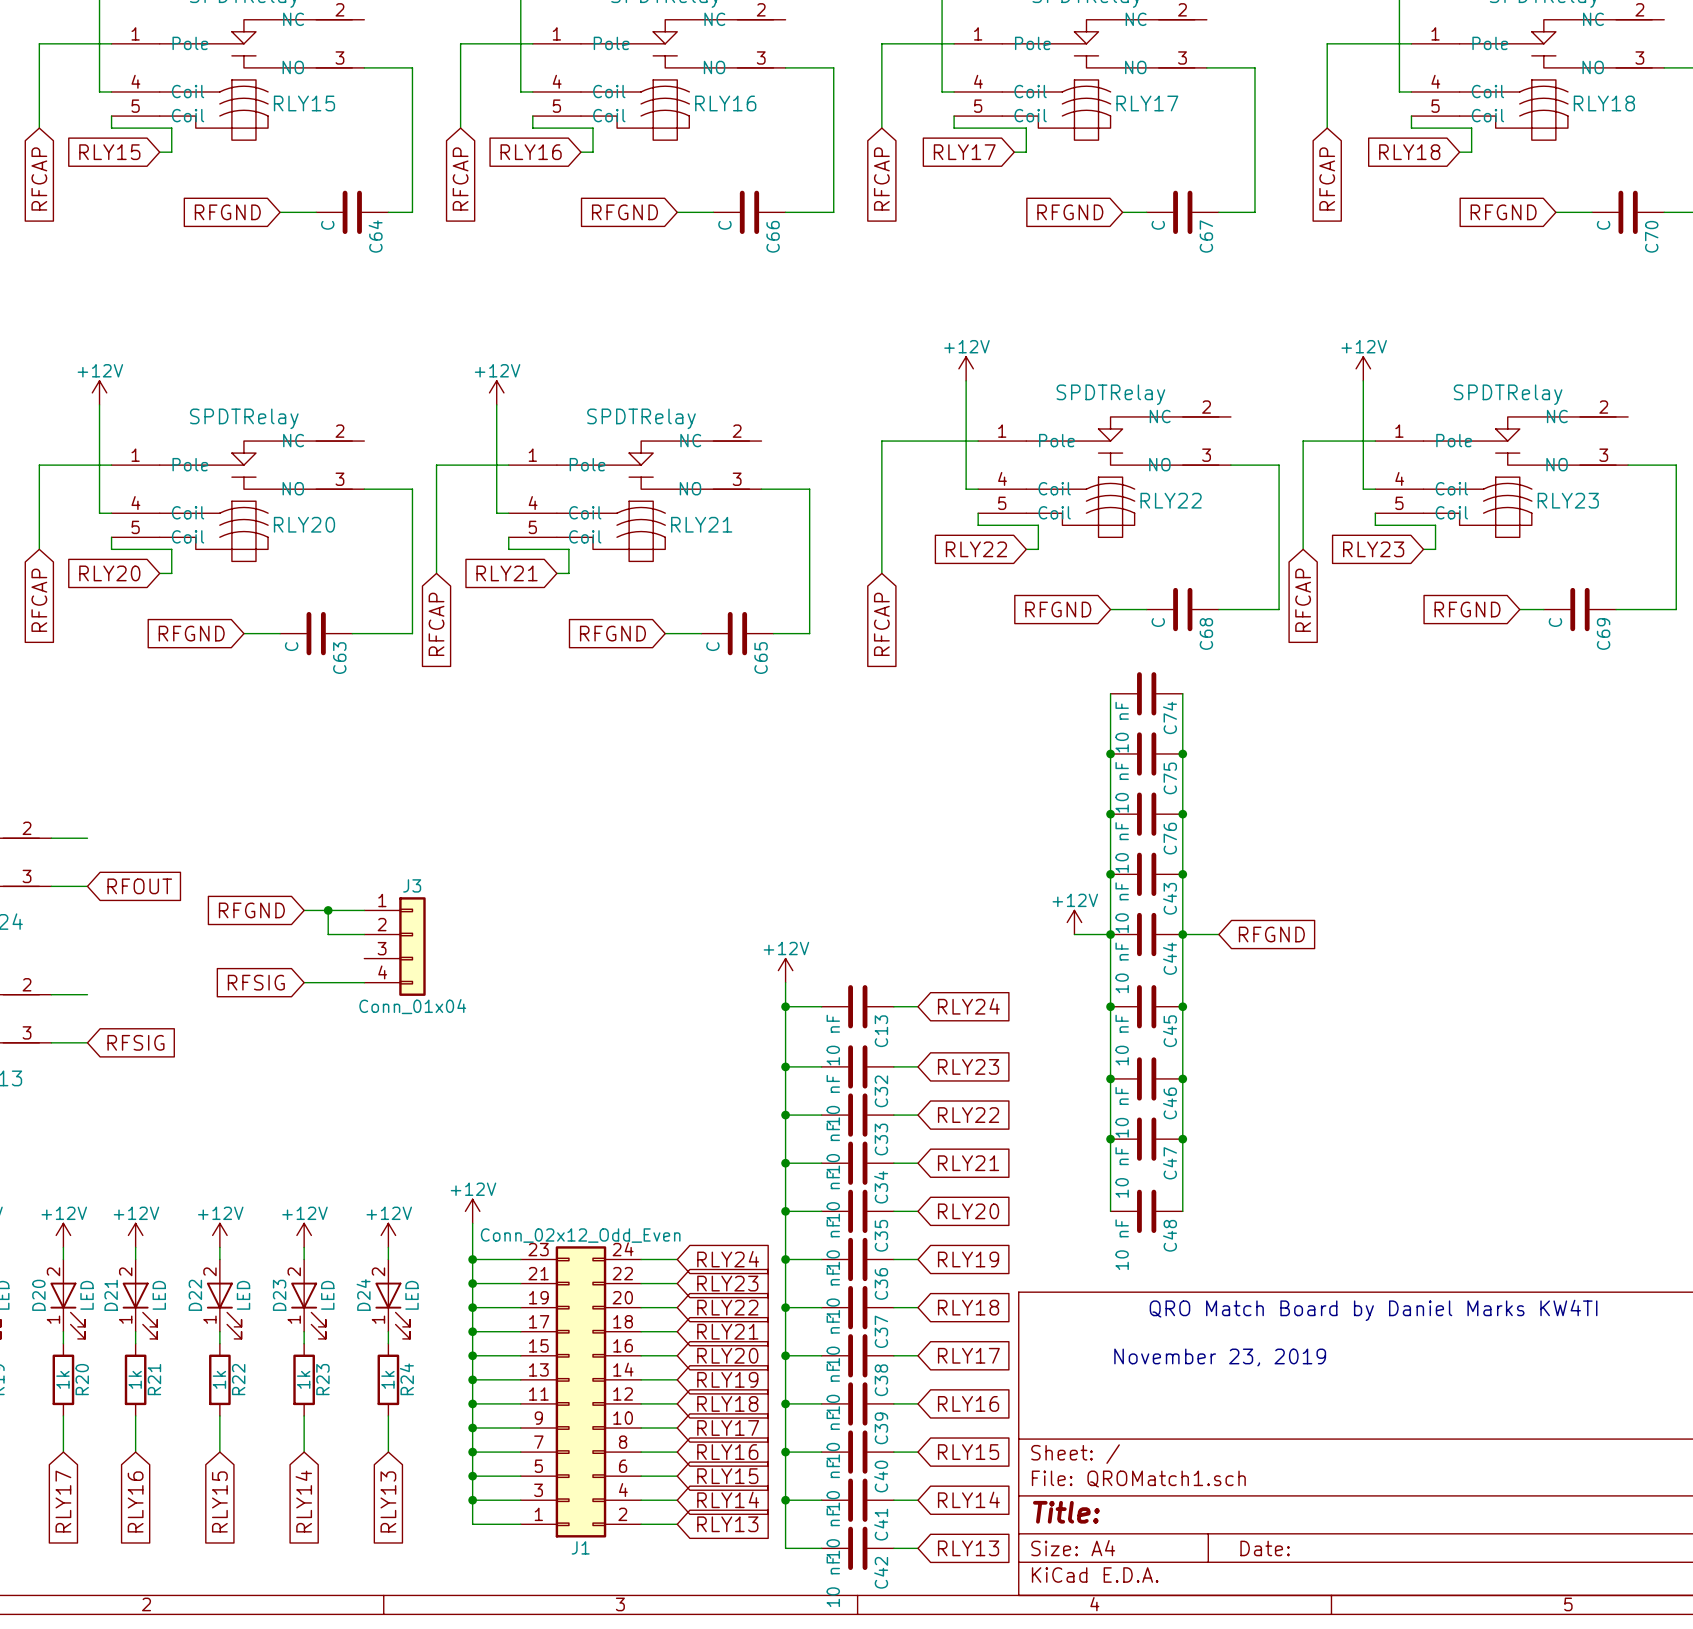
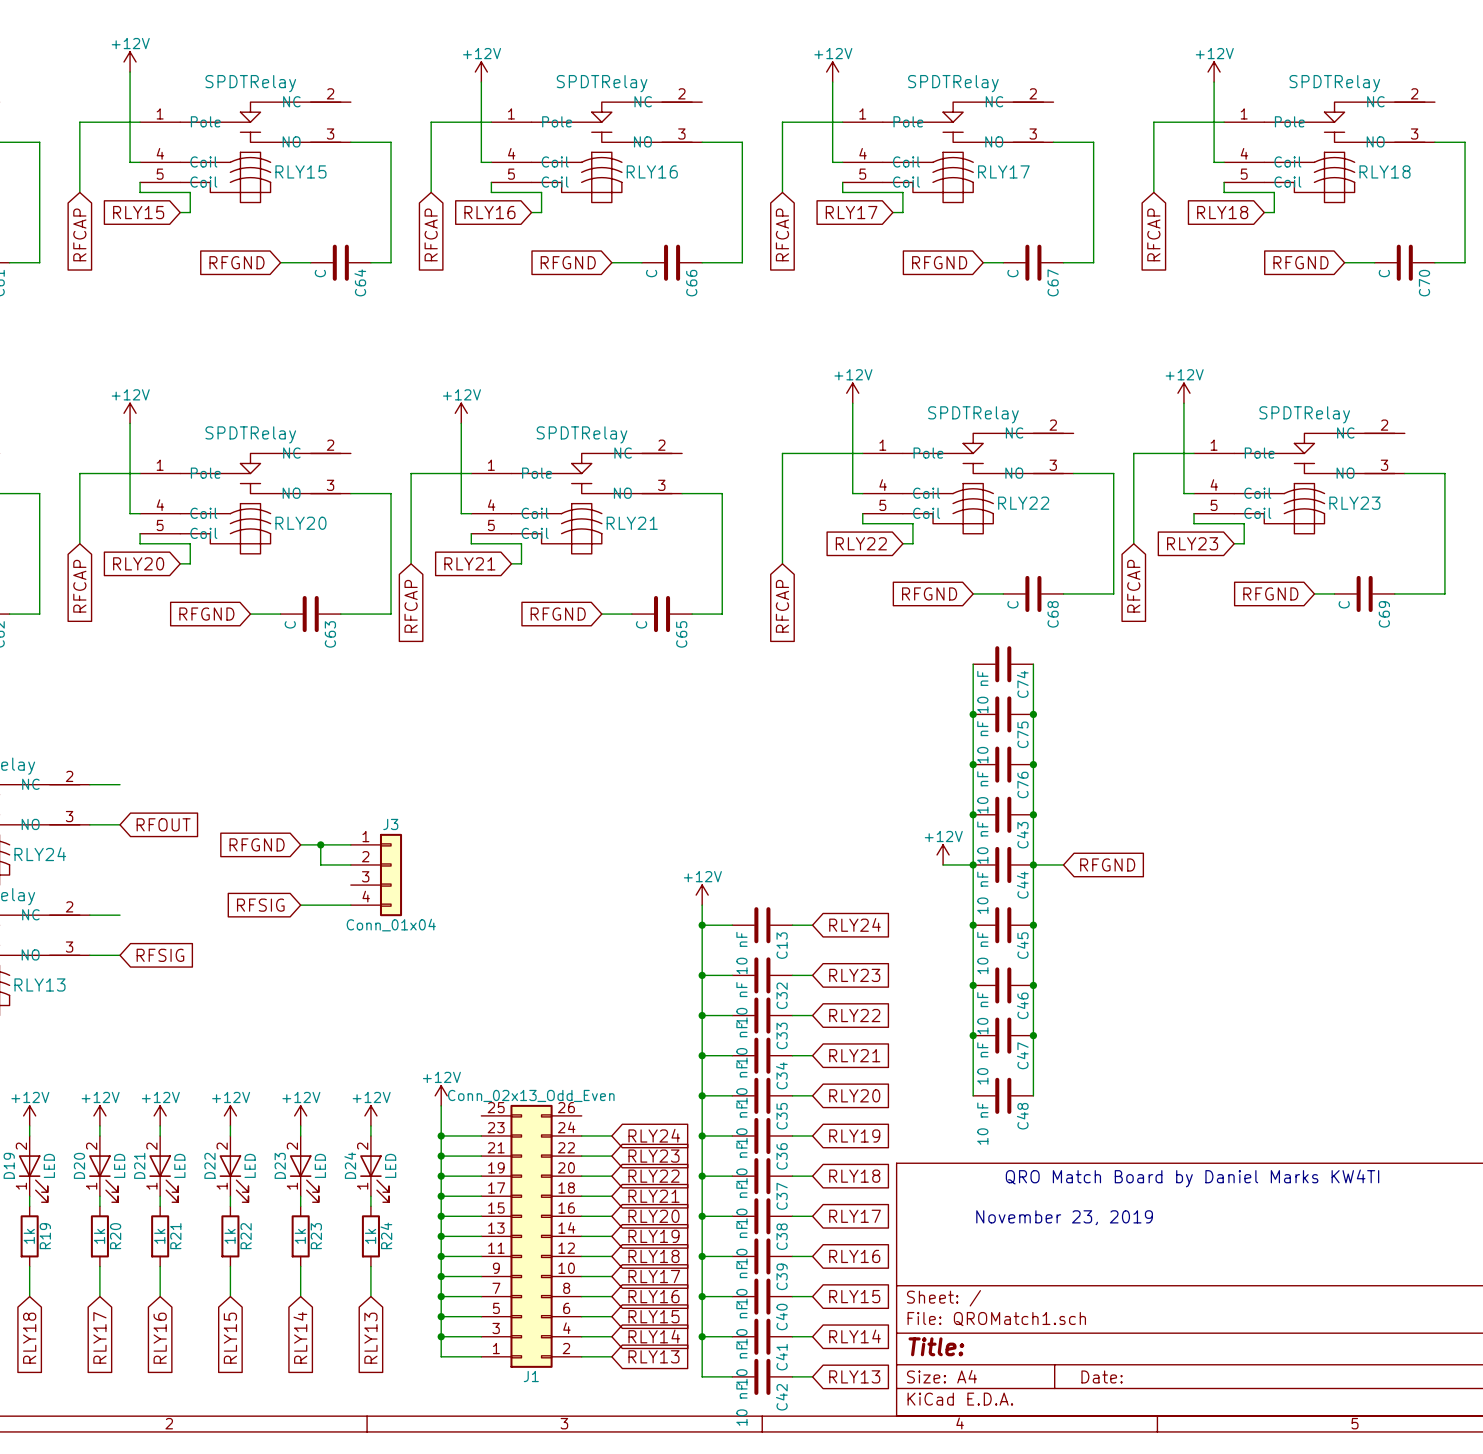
J1 value: Conn_02x12_Odd_Even (580, 1235) -> Conn_02x13_Odd_Even (531, 1095)
J1 symbol: [520, 1246, 642, 1538] -> [481, 1104, 582, 1368]

